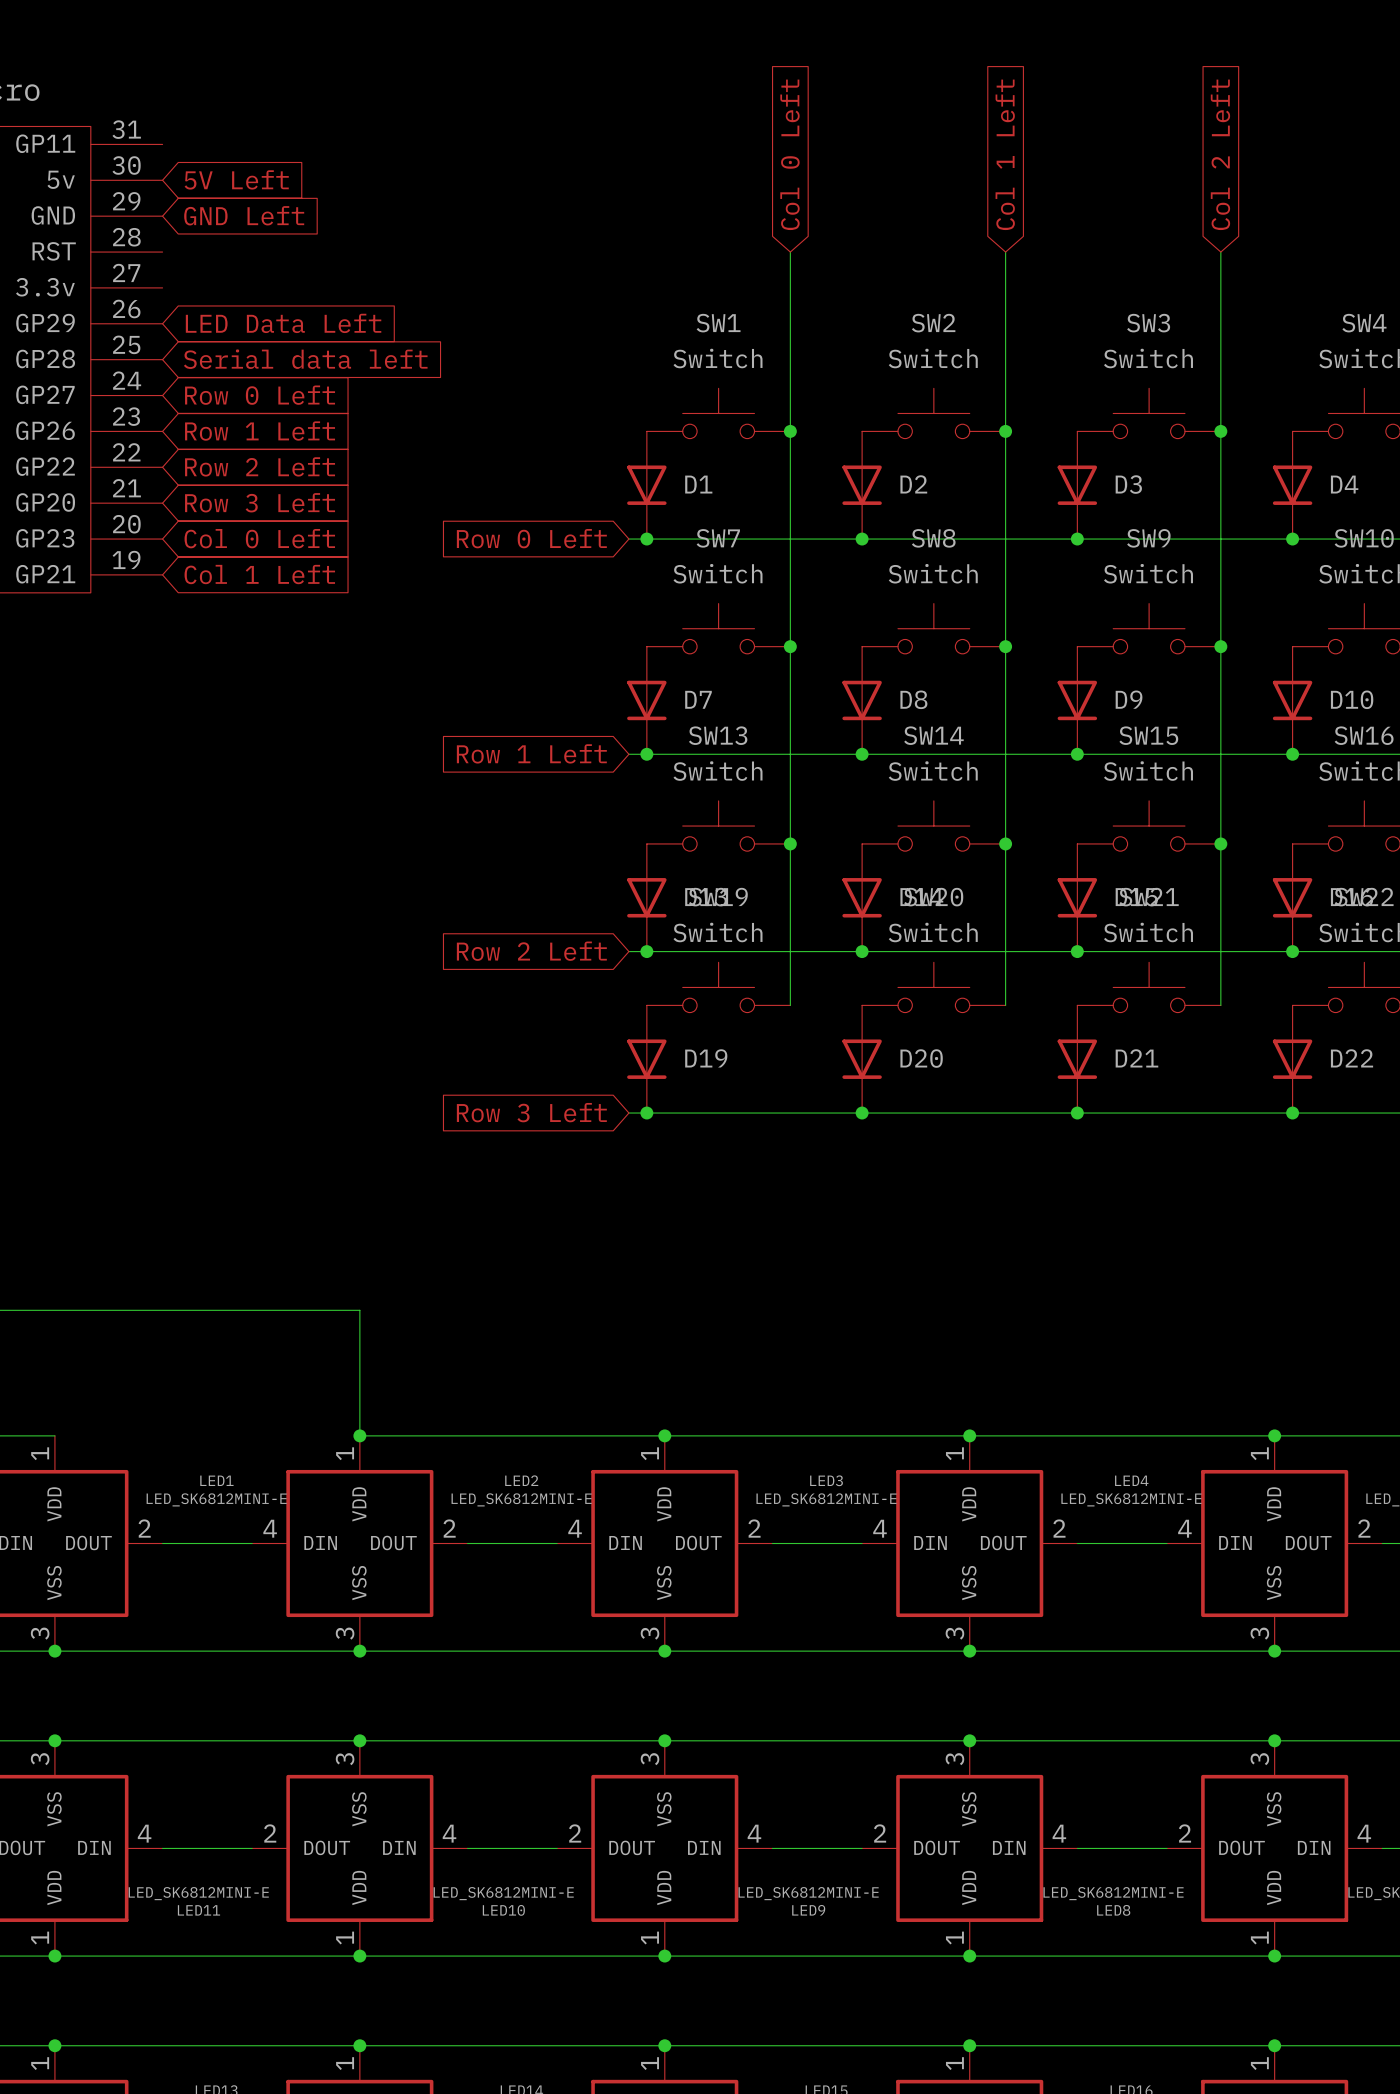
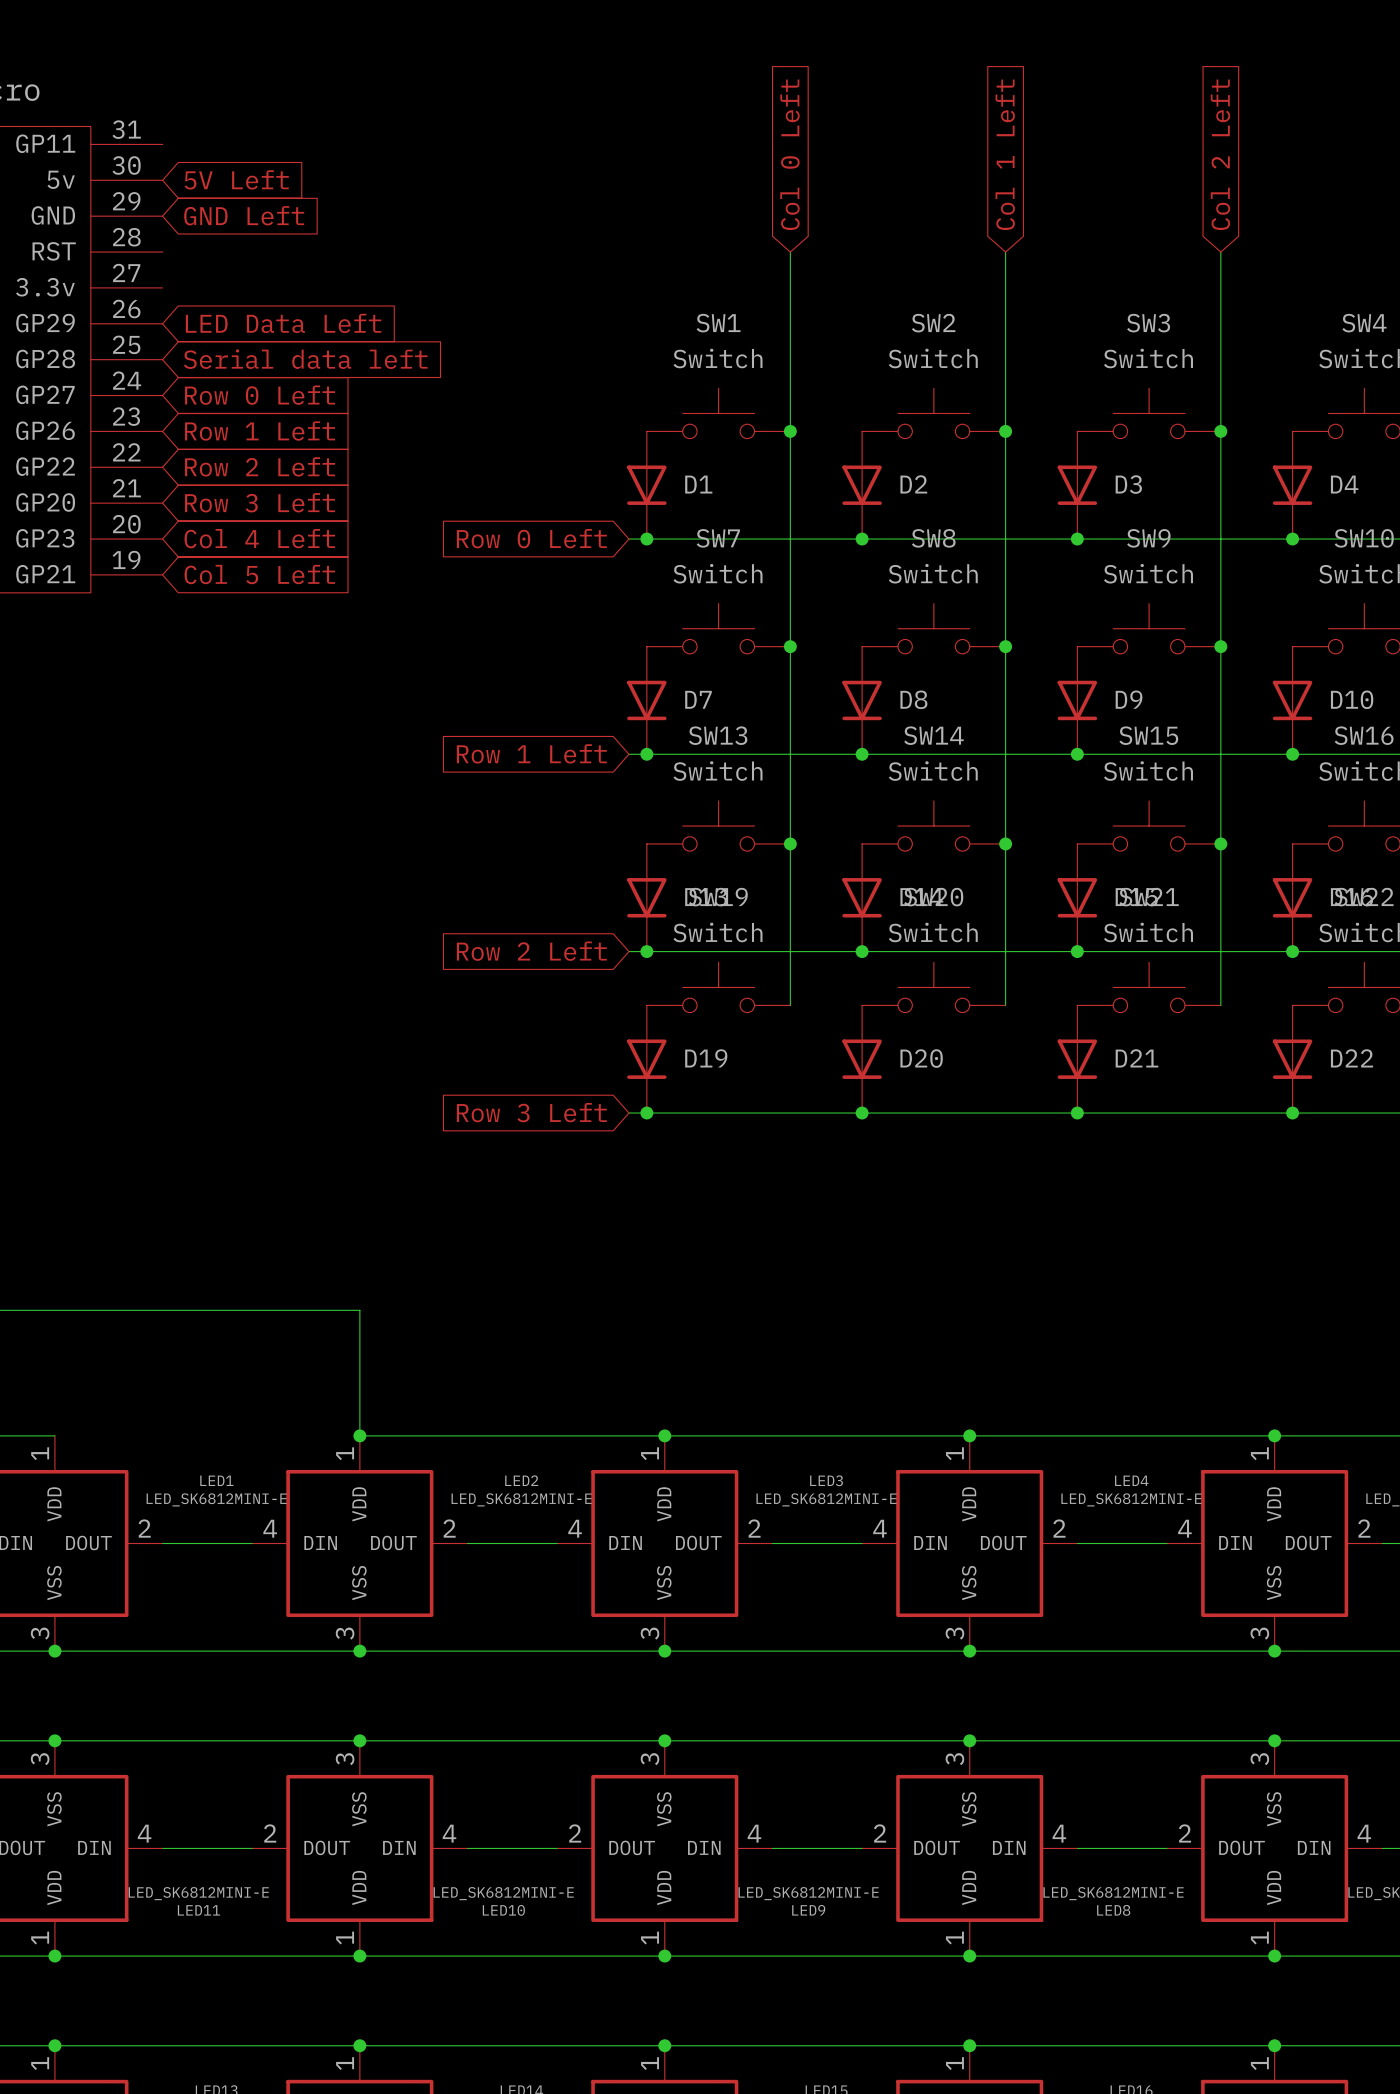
global label: Col 0 Left (259, 538) -> Col 4 Left (259, 538)
global label: Col 1 Left (259, 574) -> Col 5 Left (259, 574)

